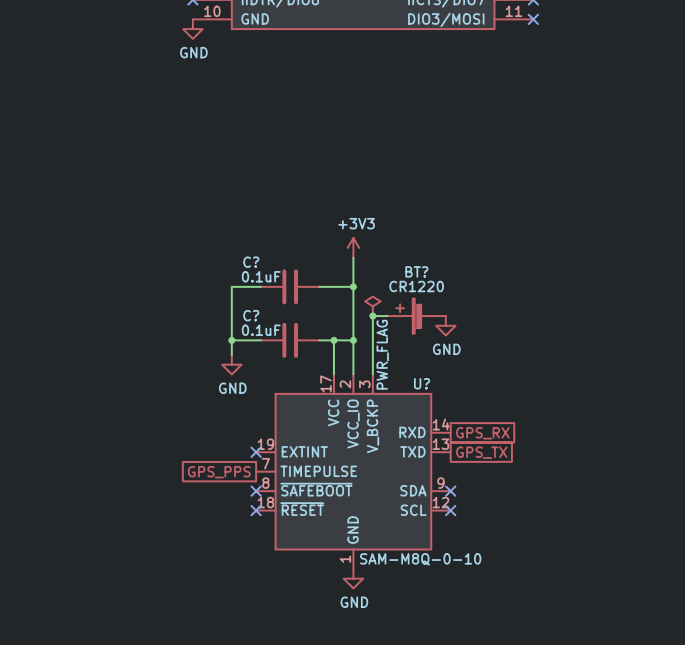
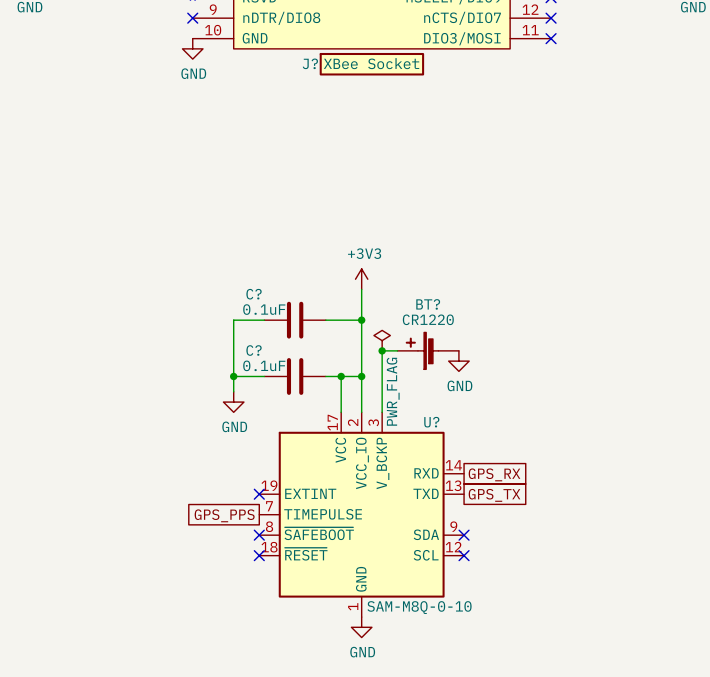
J?: none -> (371, 64)

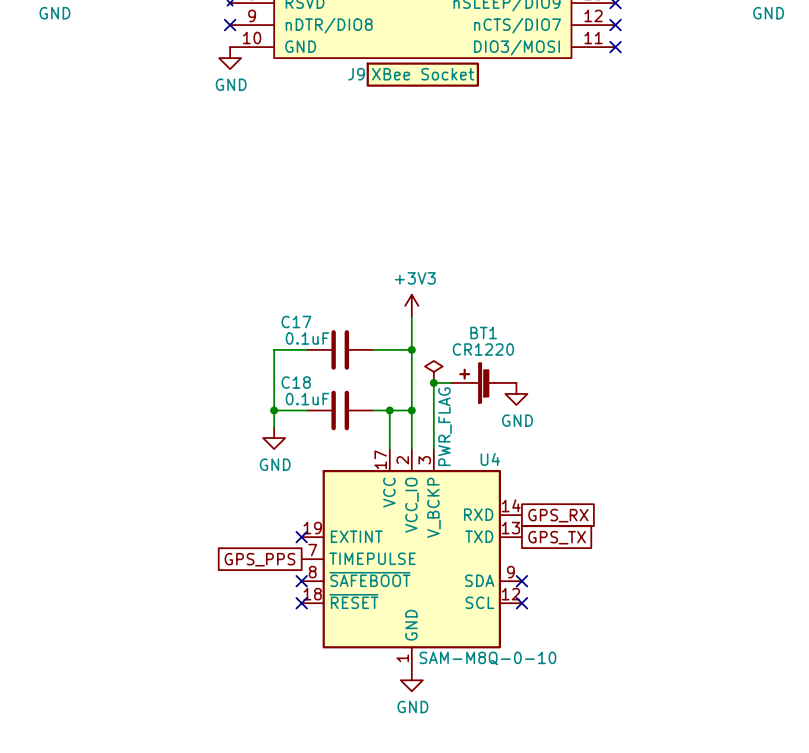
J? name: J? (310, 63) -> J9 (356, 74)
C? name: C? (254, 294) -> C17 (296, 321)
BT? name: BT? (428, 304) -> BT1 (483, 333)
C? name: C? (254, 350) -> C18 (296, 382)
U? name: U? (431, 422) -> U4 (490, 459)

